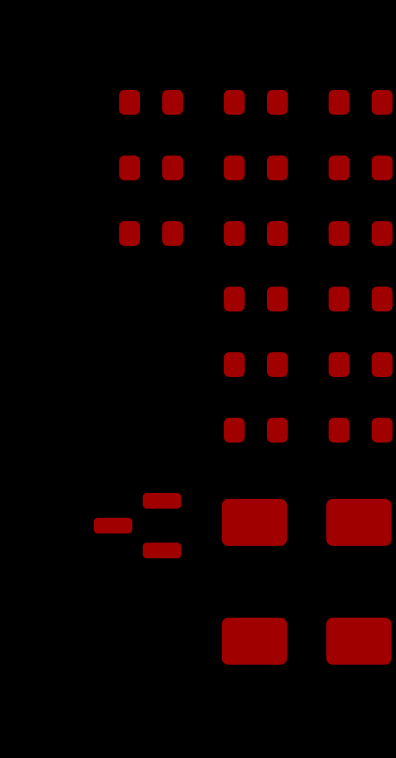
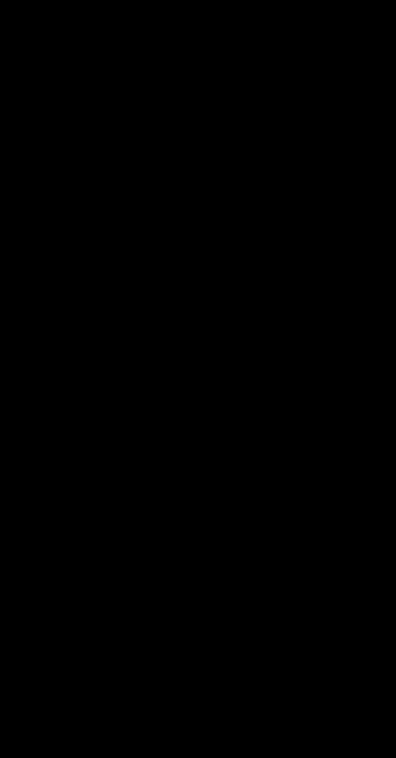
part: (151, 102) -> none
part: (255, 102) -> none
part: (360, 102) -> none
part: (151, 167) -> none
part: (255, 167) -> none
part: (360, 167) -> none
part: (151, 233) -> none
part: (255, 233) -> none
part: (360, 233) -> none
part: (255, 299) -> none
part: (360, 299) -> none
part: (255, 364) -> none
part: (360, 364) -> none
part: (255, 430) -> none
part: (360, 430) -> none
part: (306, 522) -> none
part: (137, 525) -> none
part: (306, 641) -> none

